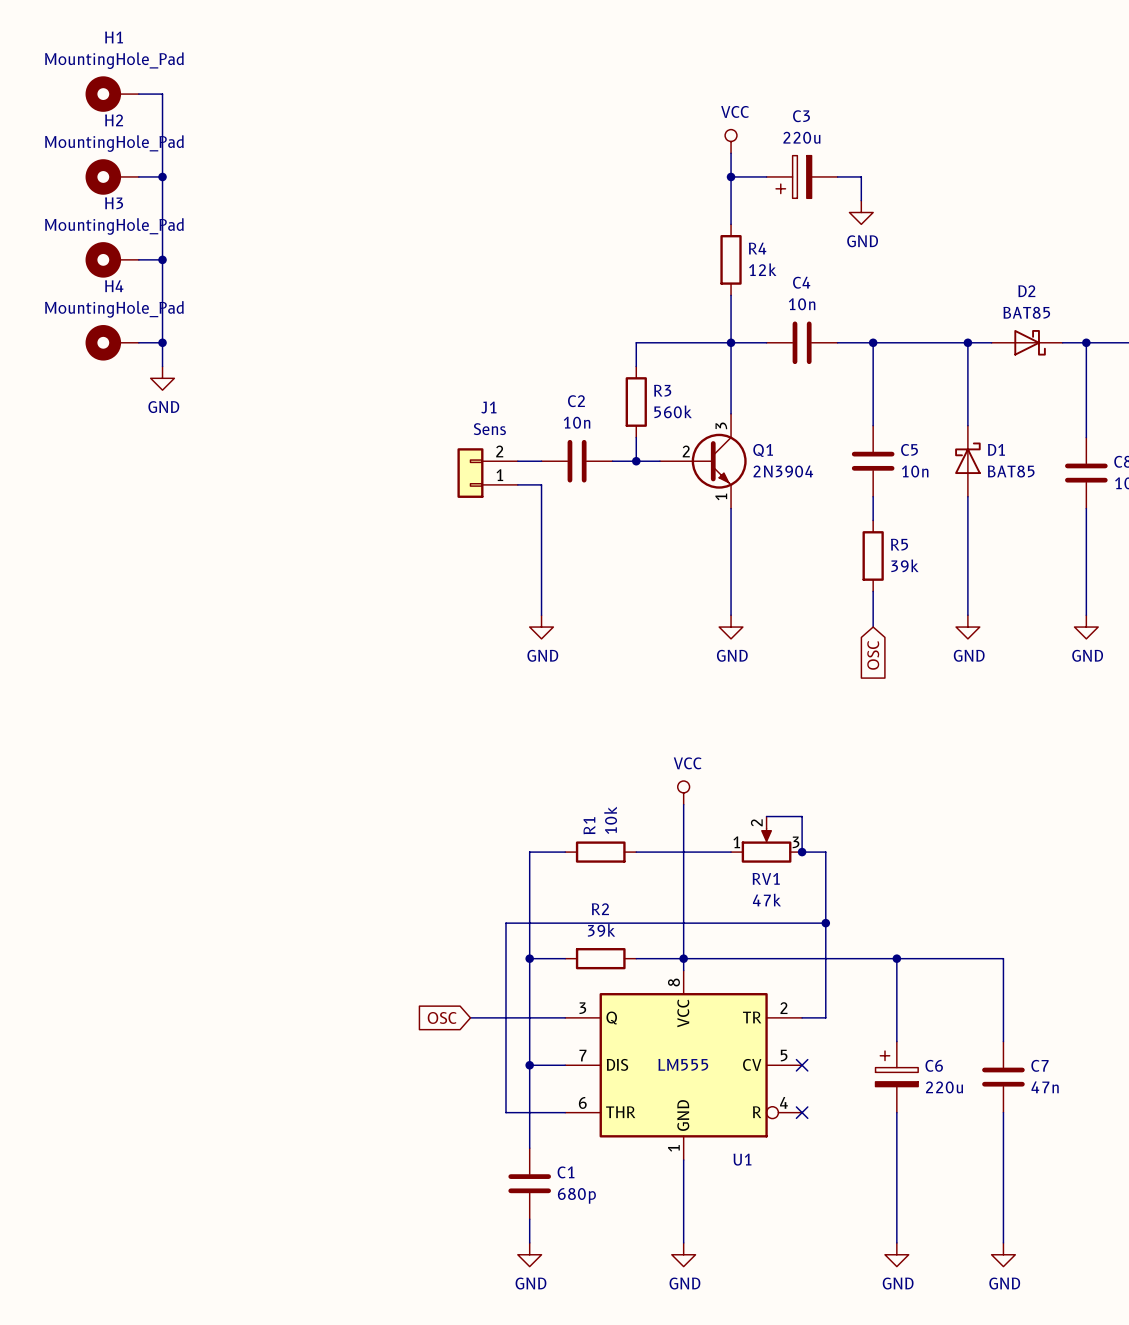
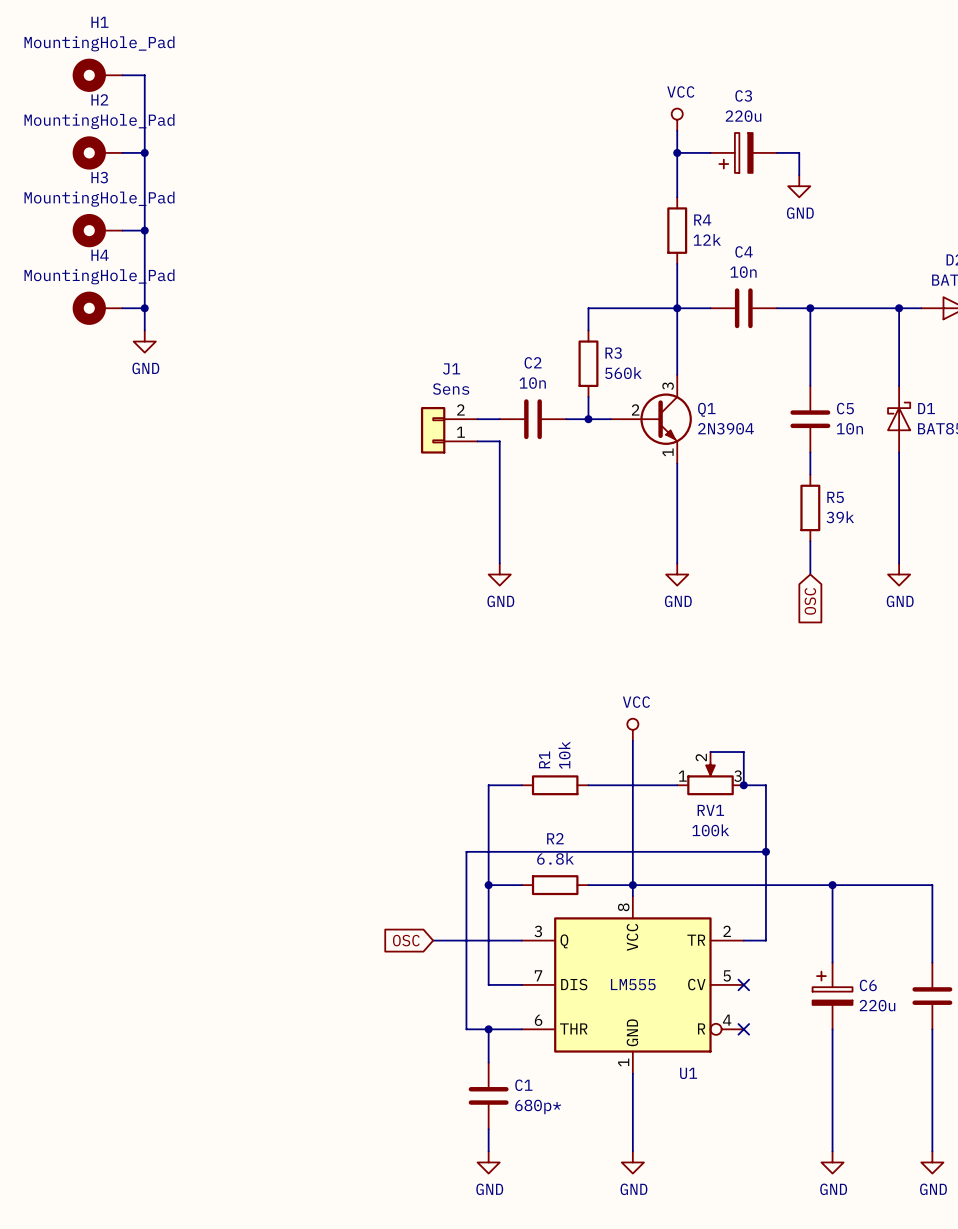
RV1 value: 47k (766, 900) -> 100k (710, 830)
R2 value: 39k (601, 930) -> 6.8k (555, 858)
wire: (529, 1065) (529, 1112) -> none
junction position: (529, 1065) -> (488, 1029)
C1 value: 680p (576, 1195) -> 680p* (538, 1106)

